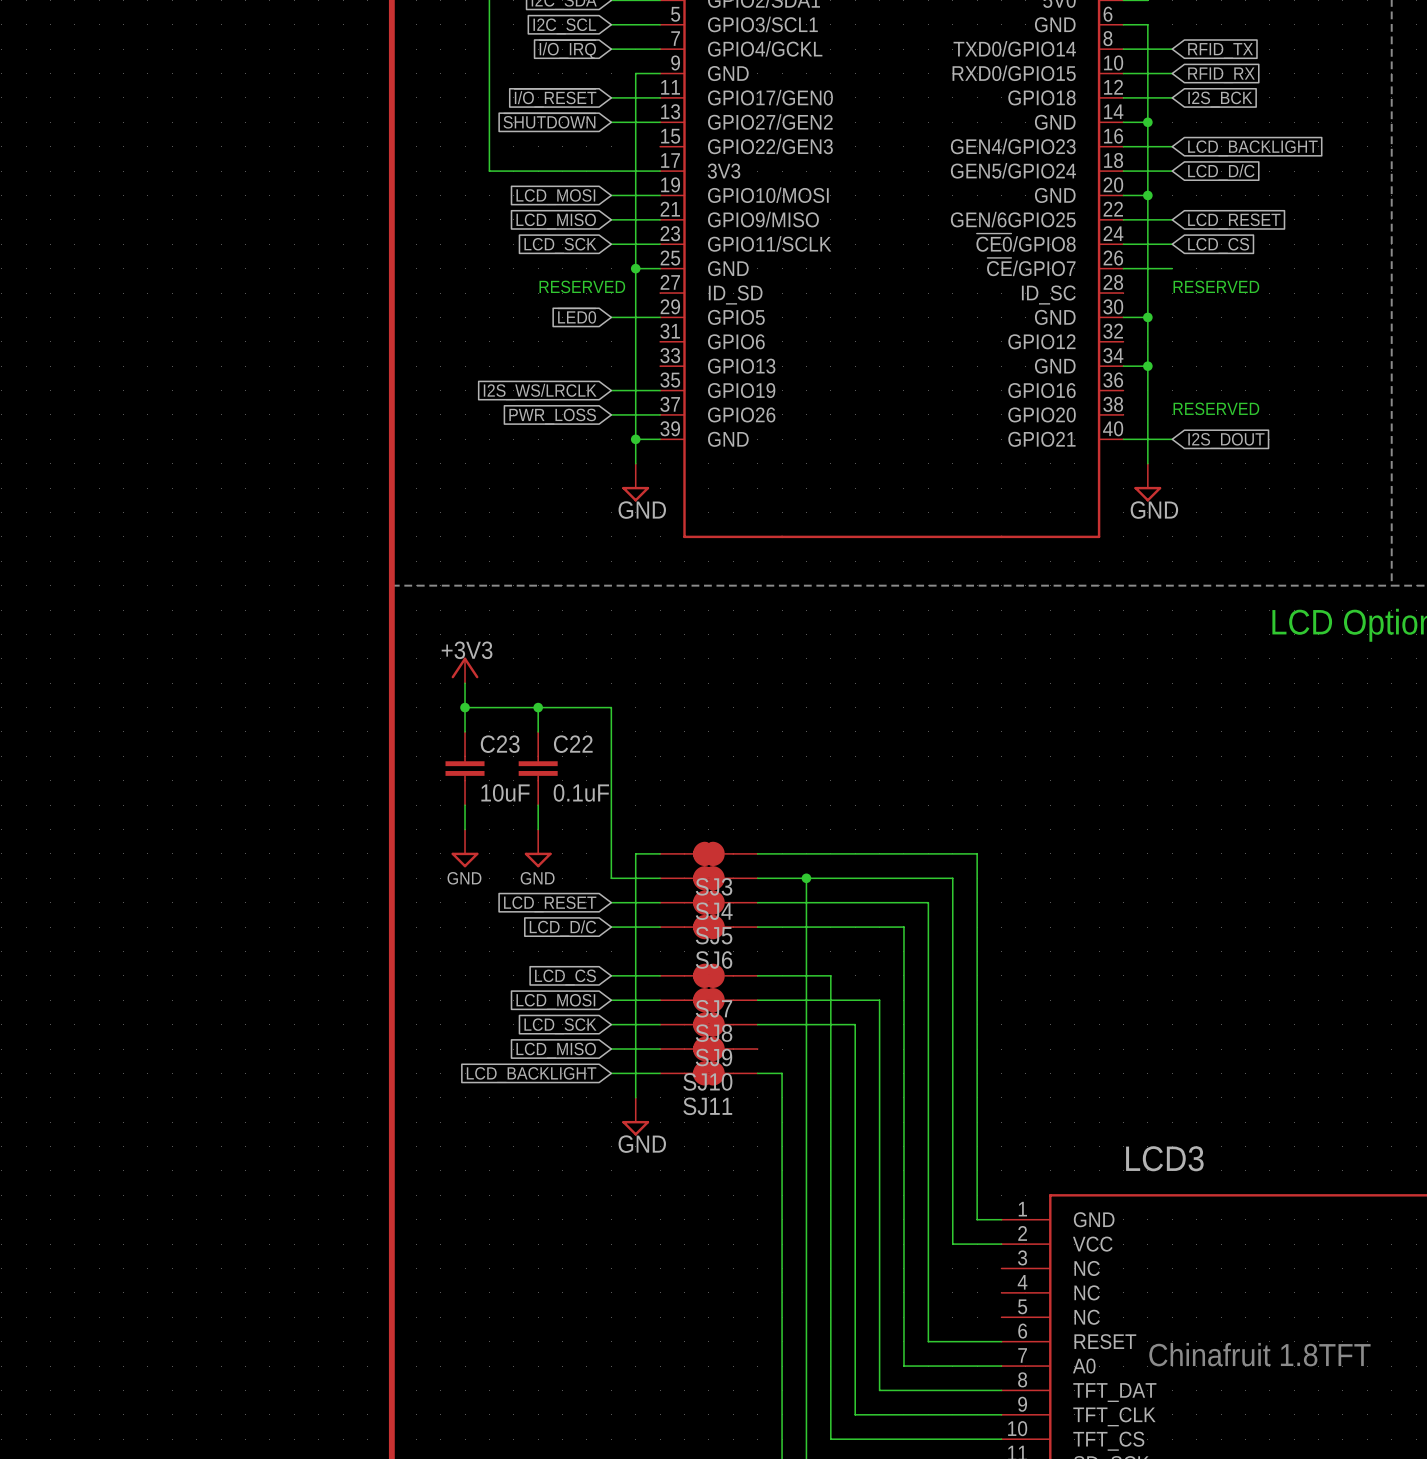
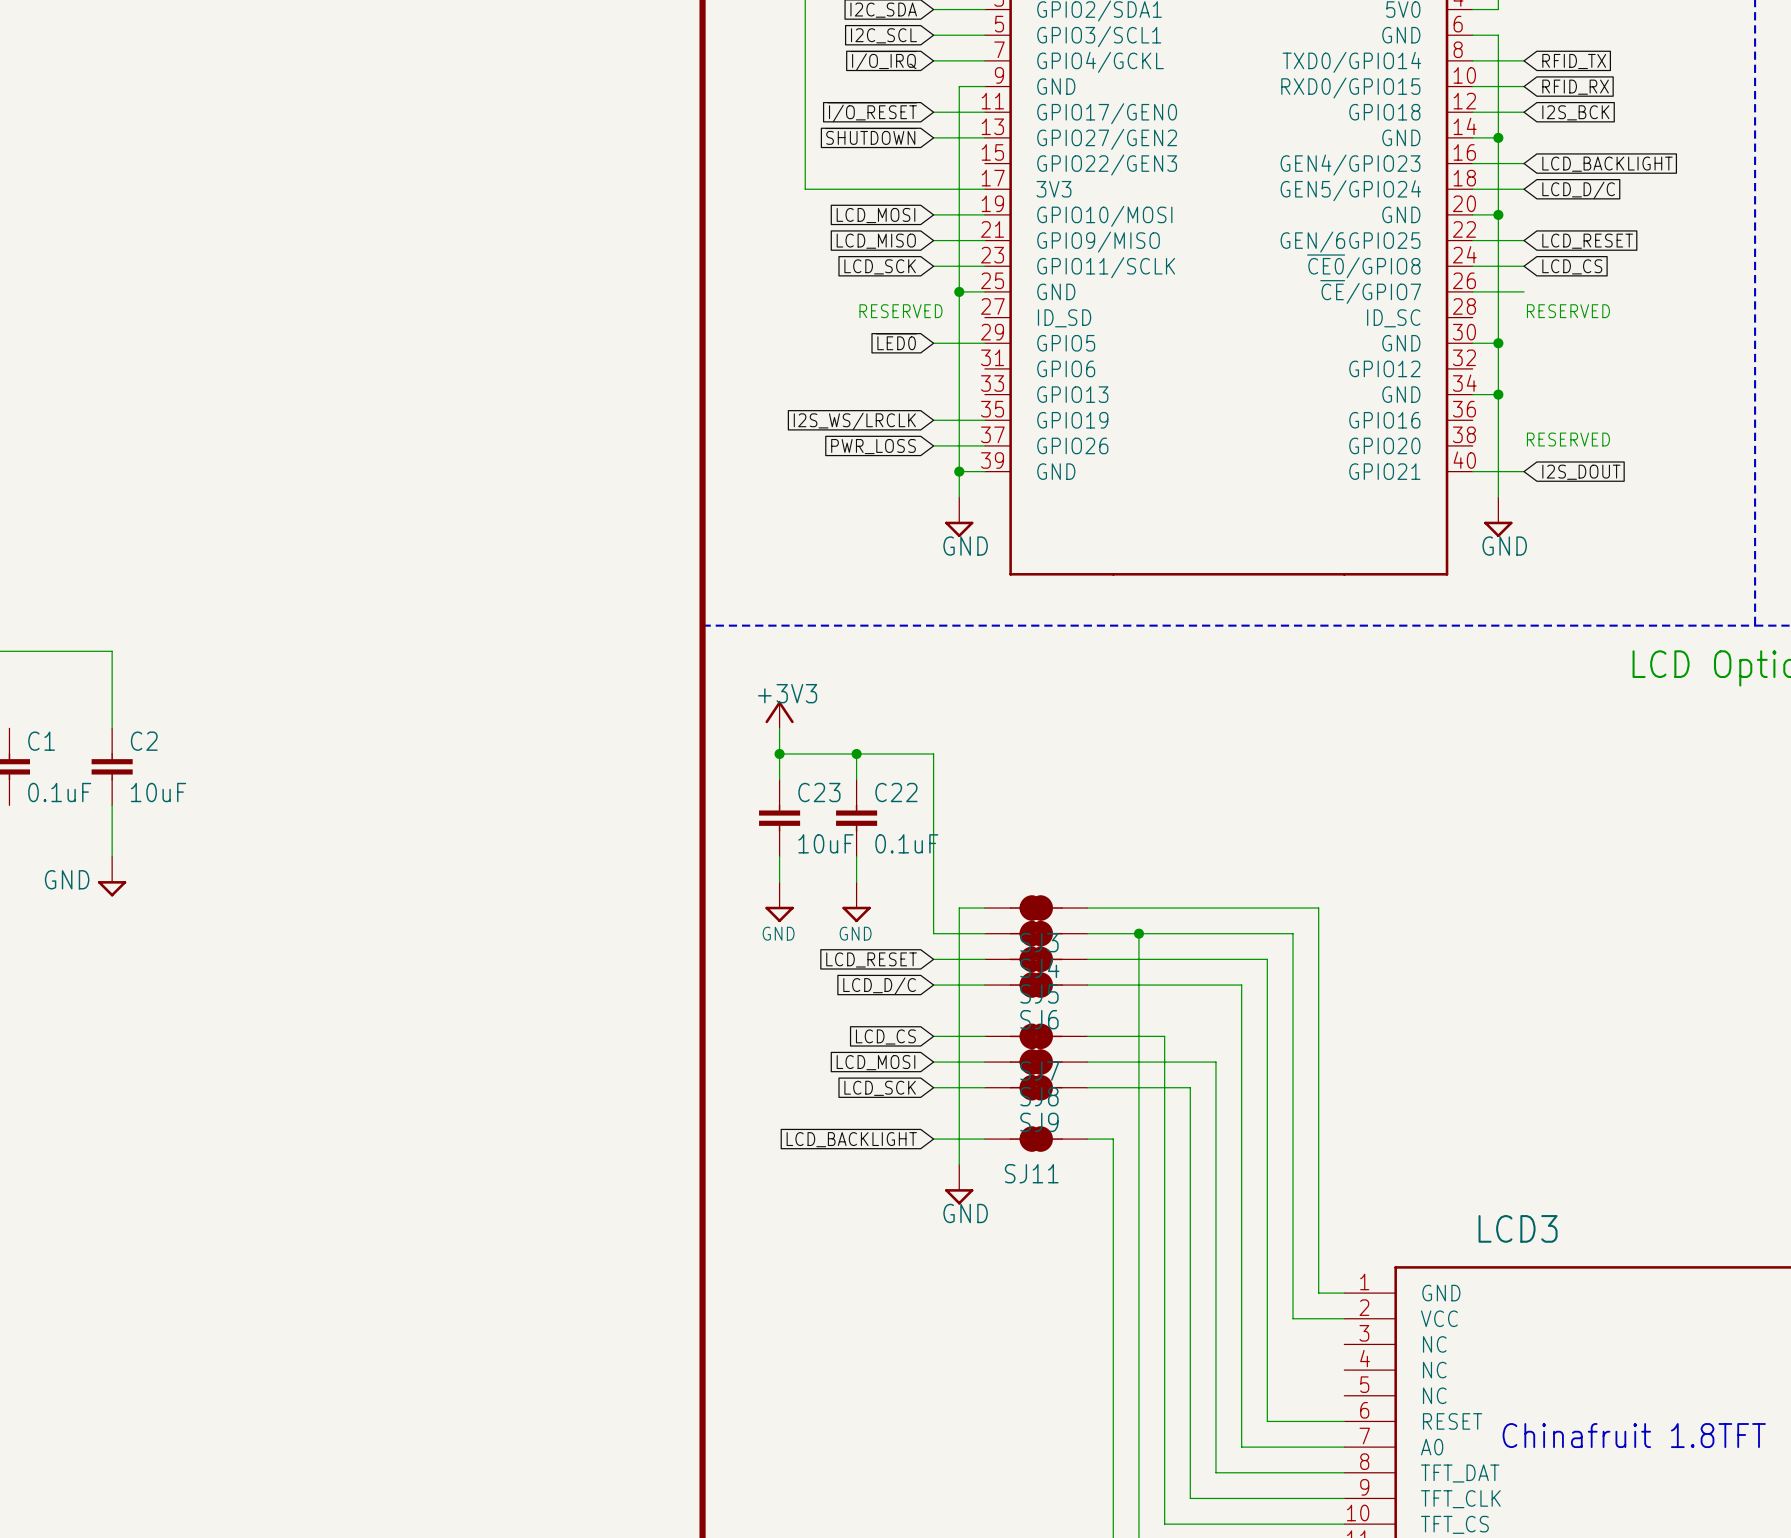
wire: (611, 1049) (660, 1049) -> none
SJ10: (708, 1049) -> none
global label: LCD_MISO (556, 1050) -> none

